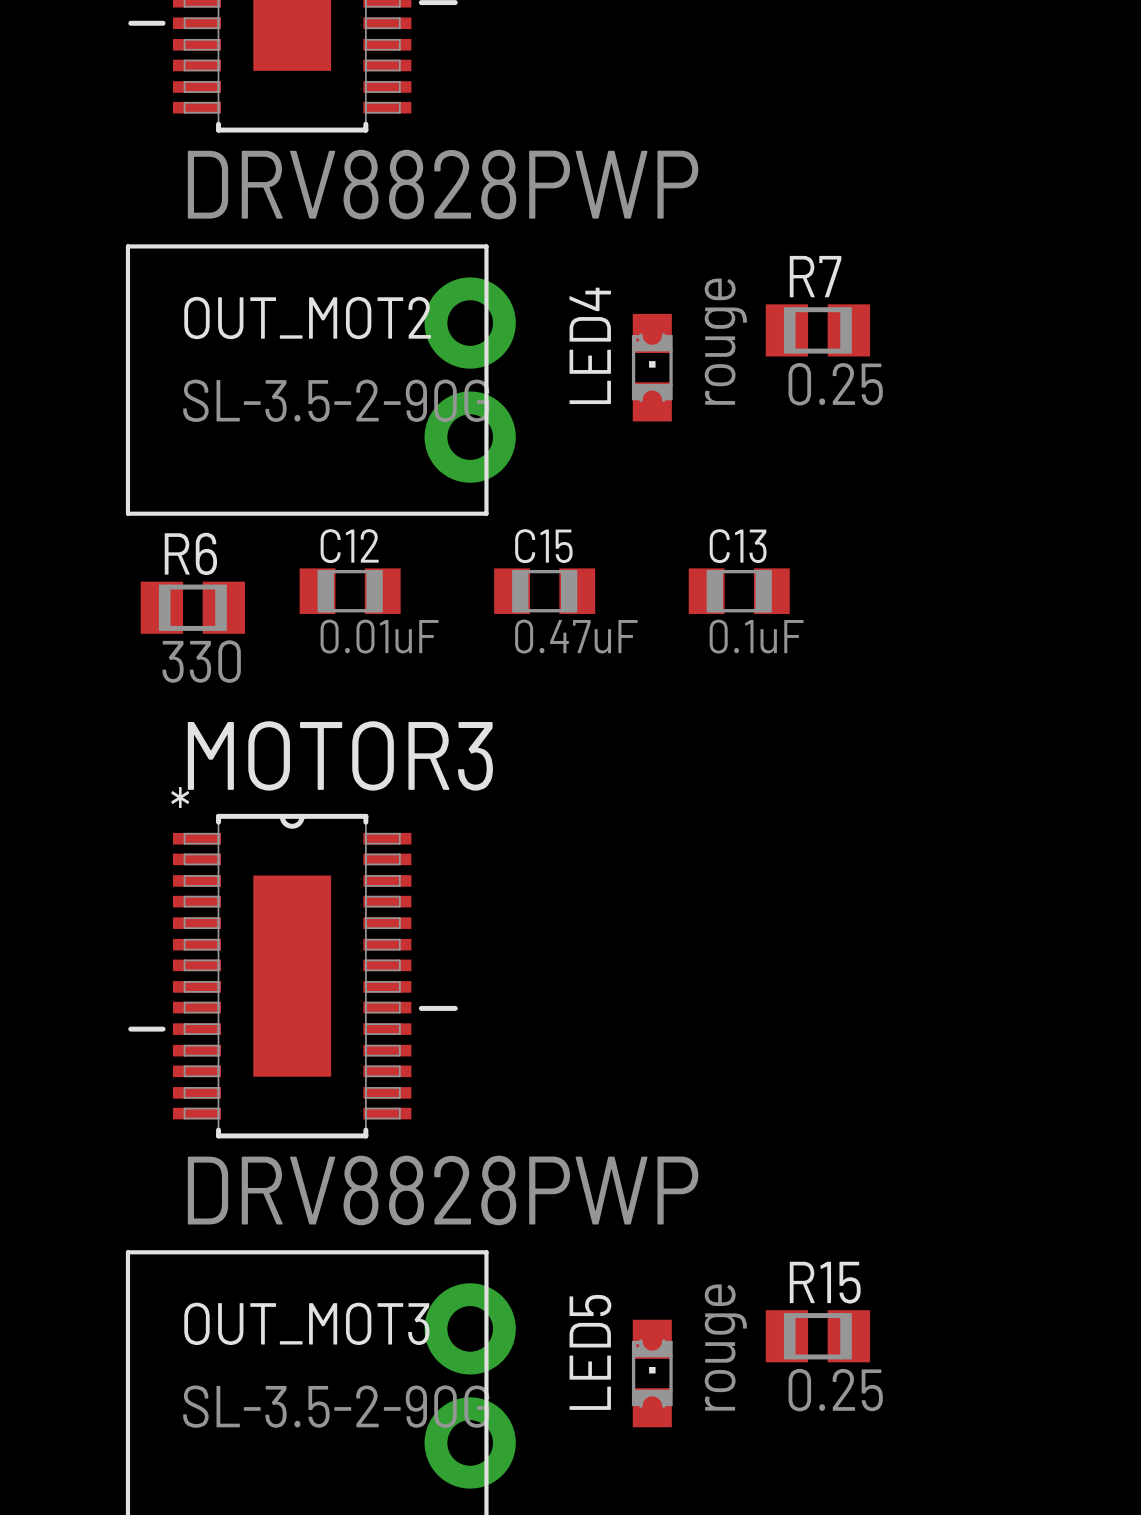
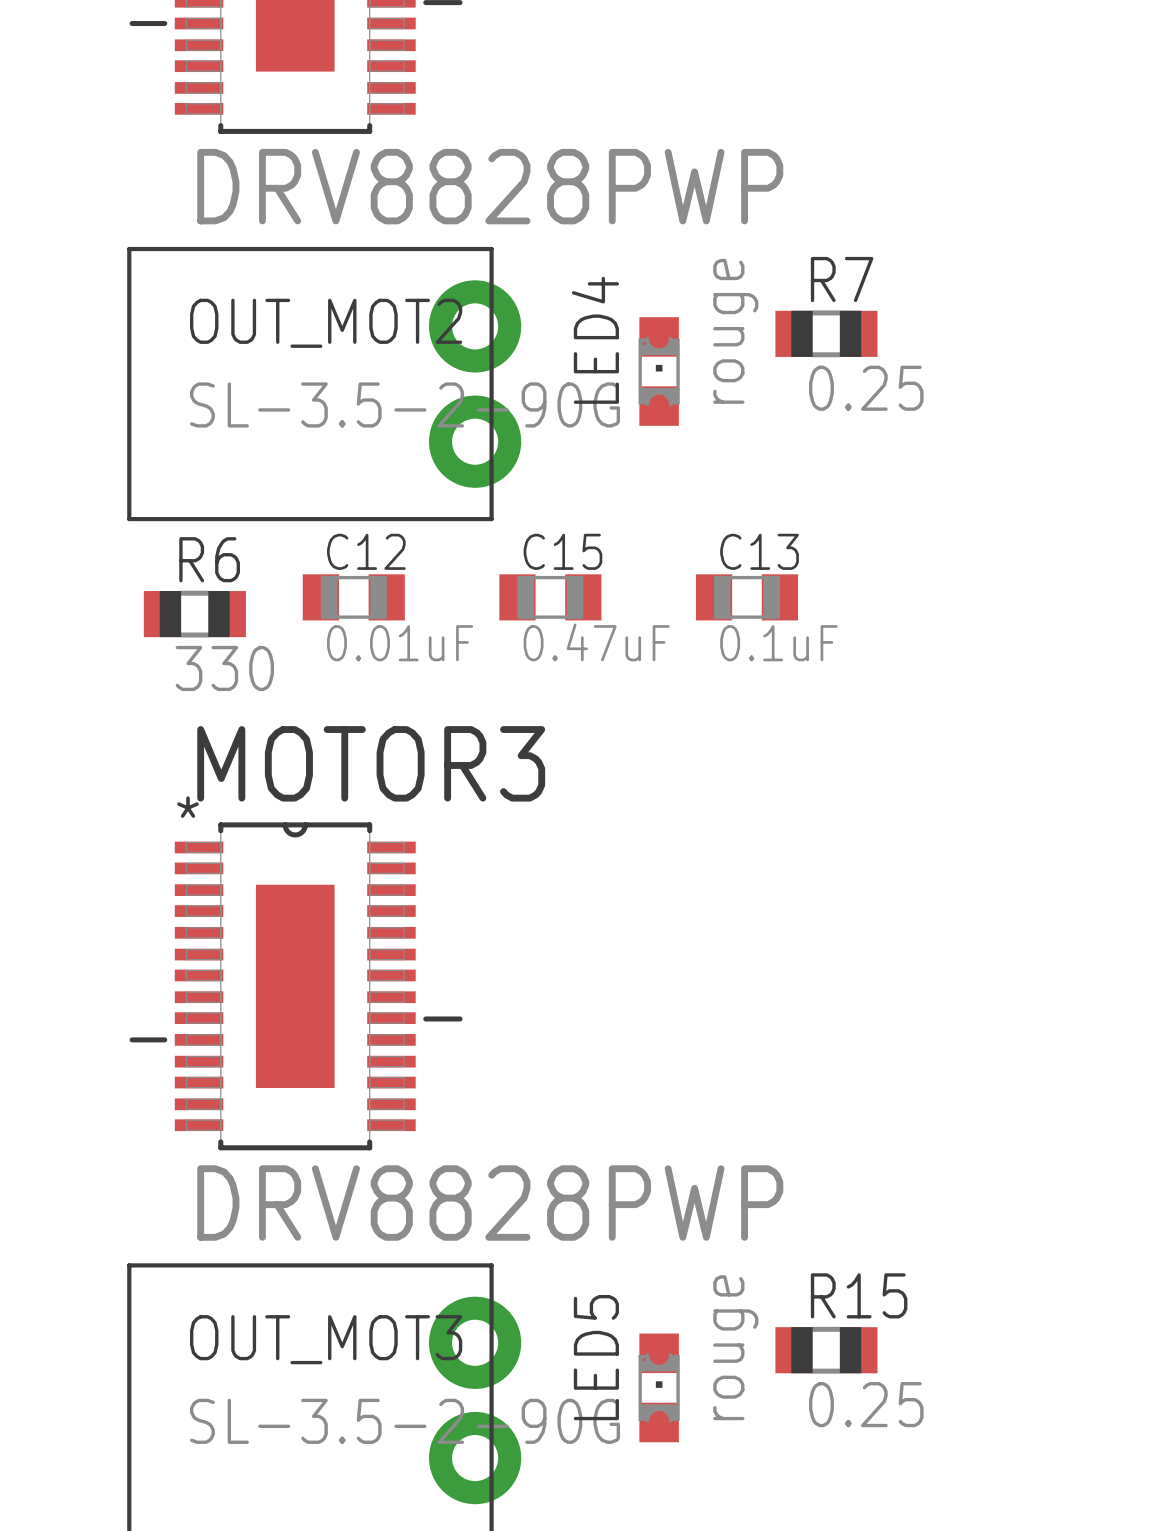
R7 footprint: [765, 304, 871, 357] -> [775, 310, 878, 358]
R6 footprint: [140, 581, 246, 634] -> [143, 590, 246, 638]
R15 footprint: [765, 1310, 871, 1363] -> [775, 1326, 878, 1374]

